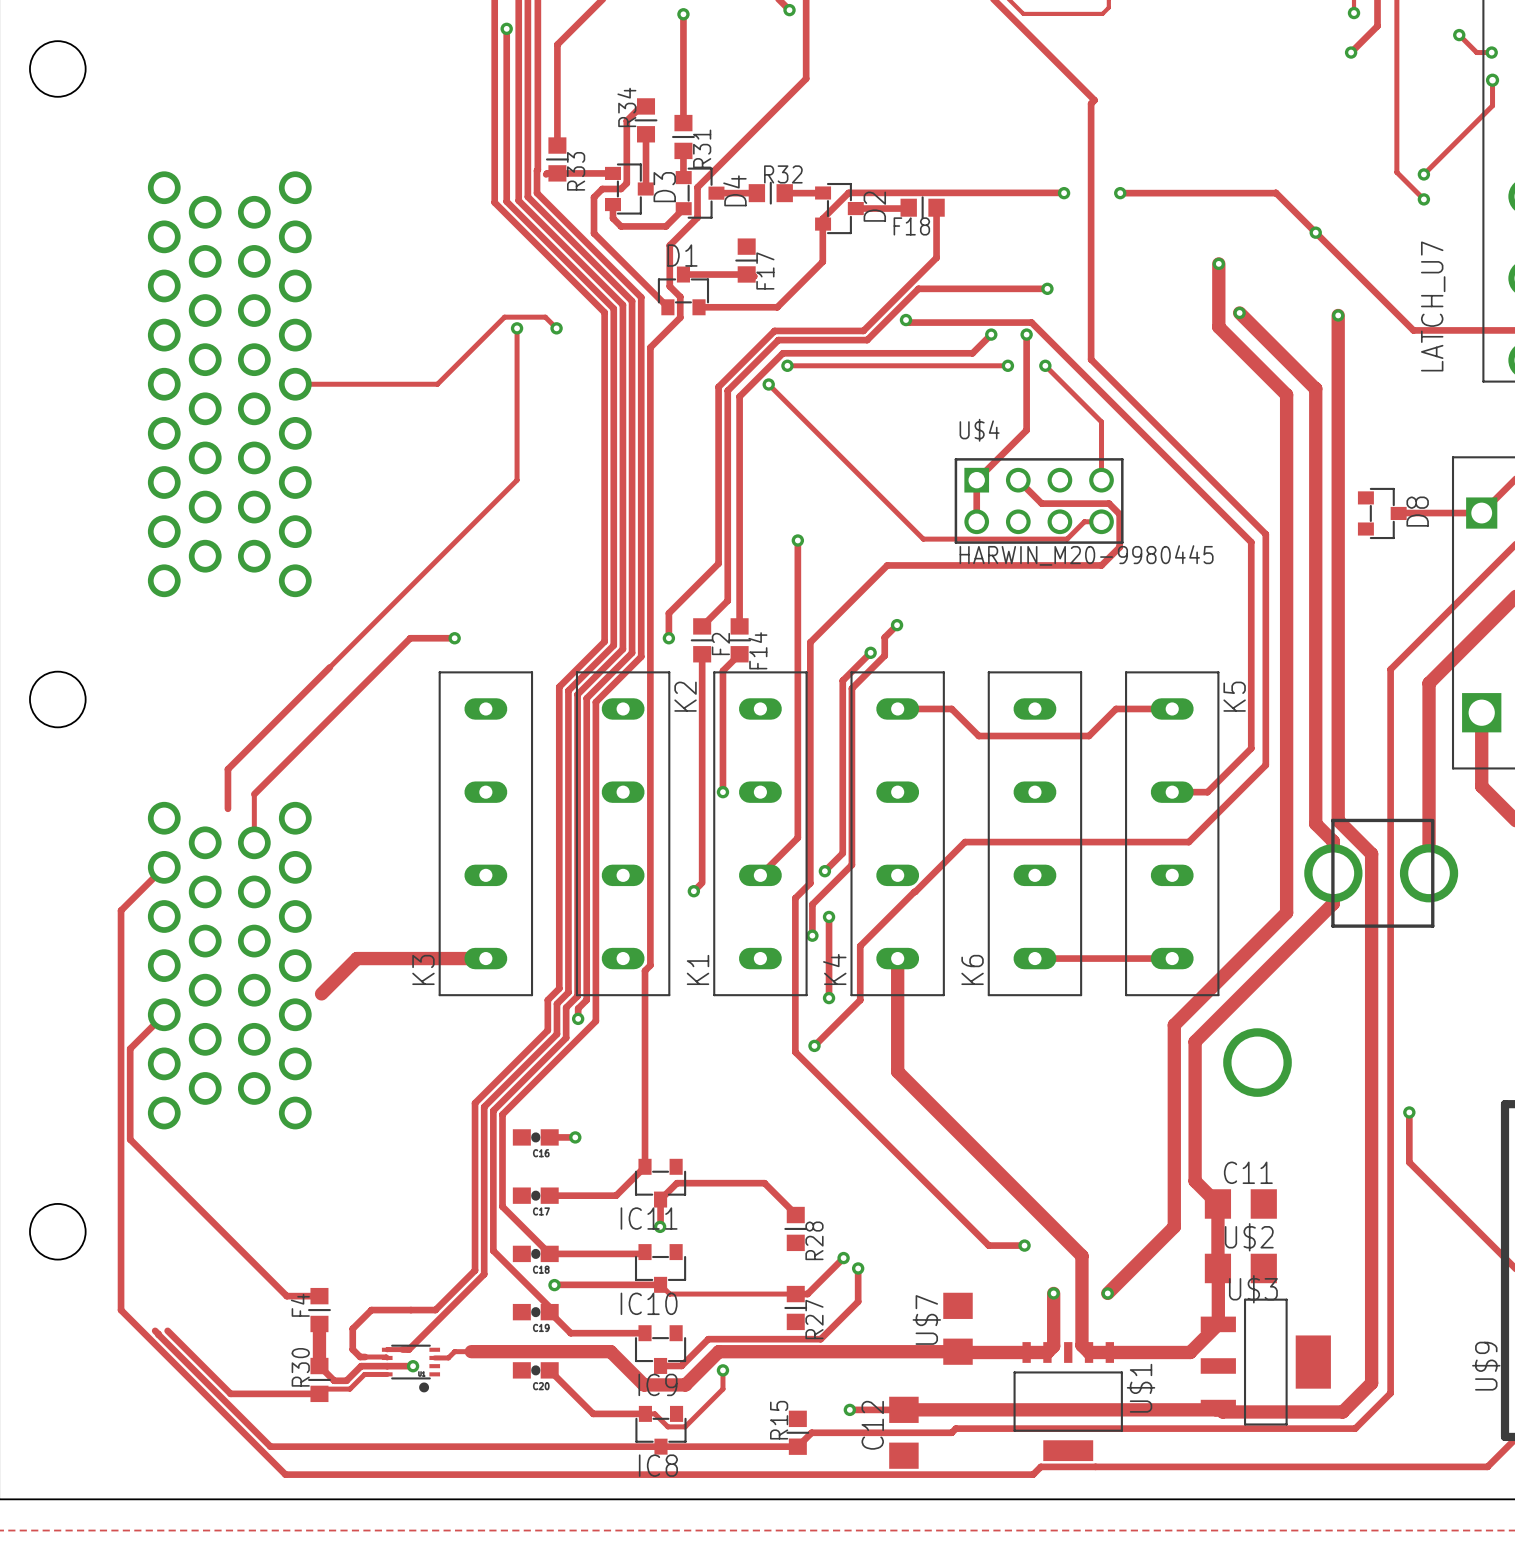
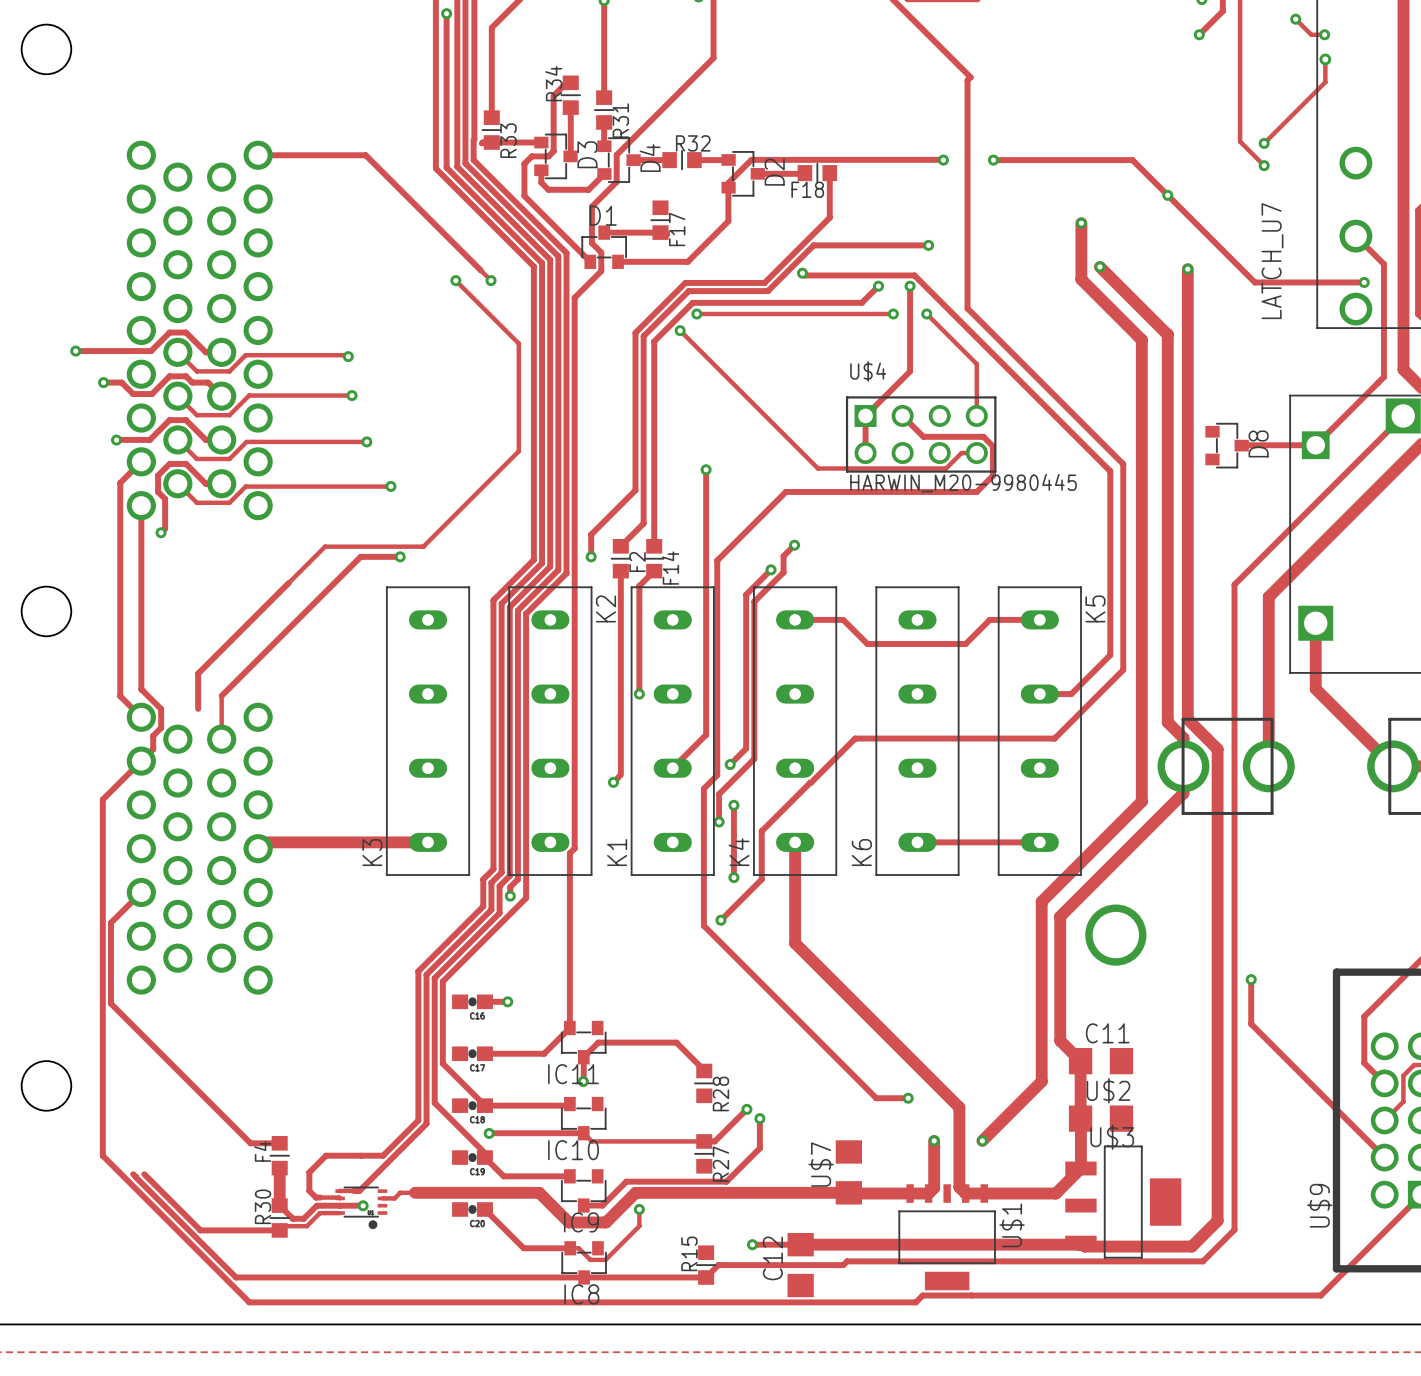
track: (545, 317) (504, 317) (437, 384) (295, 384) -> (481, 270) (365, 155) (258, 155)
track: (517, 328) (517, 480) (370, 626) -> (455, 280) (518, 343) (518, 451) (423, 546) (325, 546)
track: none -> (75, 351) (151, 351) (169, 332) (186, 332) (205, 352) (221, 352)
via: none -> (75, 351)
track: none -> (177, 352) (196, 371) (229, 371) (245, 355) (348, 356)
via: none -> (348, 356)
track: none -> (103, 382) (121, 382) (133, 394) (151, 394) (169, 376) (186, 376) (192, 382) (208, 382) (221, 396)
via: none -> (103, 382)
track: none -> (352, 395) (249, 395) (229, 415) (196, 415) (177, 396)
via: none -> (352, 395)
track: none -> (116, 439) (149, 439) (169, 420) (186, 420) (205, 439) (221, 439)
via: none -> (116, 440)
track: none -> (177, 439) (196, 458) (229, 458) (246, 441) (366, 441)
via: none -> (366, 441)
track: none -> (141, 461) (120, 482) (120, 696) (141, 717)
track: none -> (177, 483) (196, 502) (229, 502) (245, 486) (390, 486)
track: none -> (221, 483) (205, 483) (186, 463) (169, 463) (158, 475) (158, 491) (165, 499) (165, 528) (161, 532)
via: none -> (390, 486)
track: none -> (141, 505) (141, 689) (161, 709) (161, 727) (153, 735) (153, 749) (141, 761)
via: none -> (161, 532)
track: (356, 958) (321, 993) -> (313, 842) (264, 842) (258, 848)

